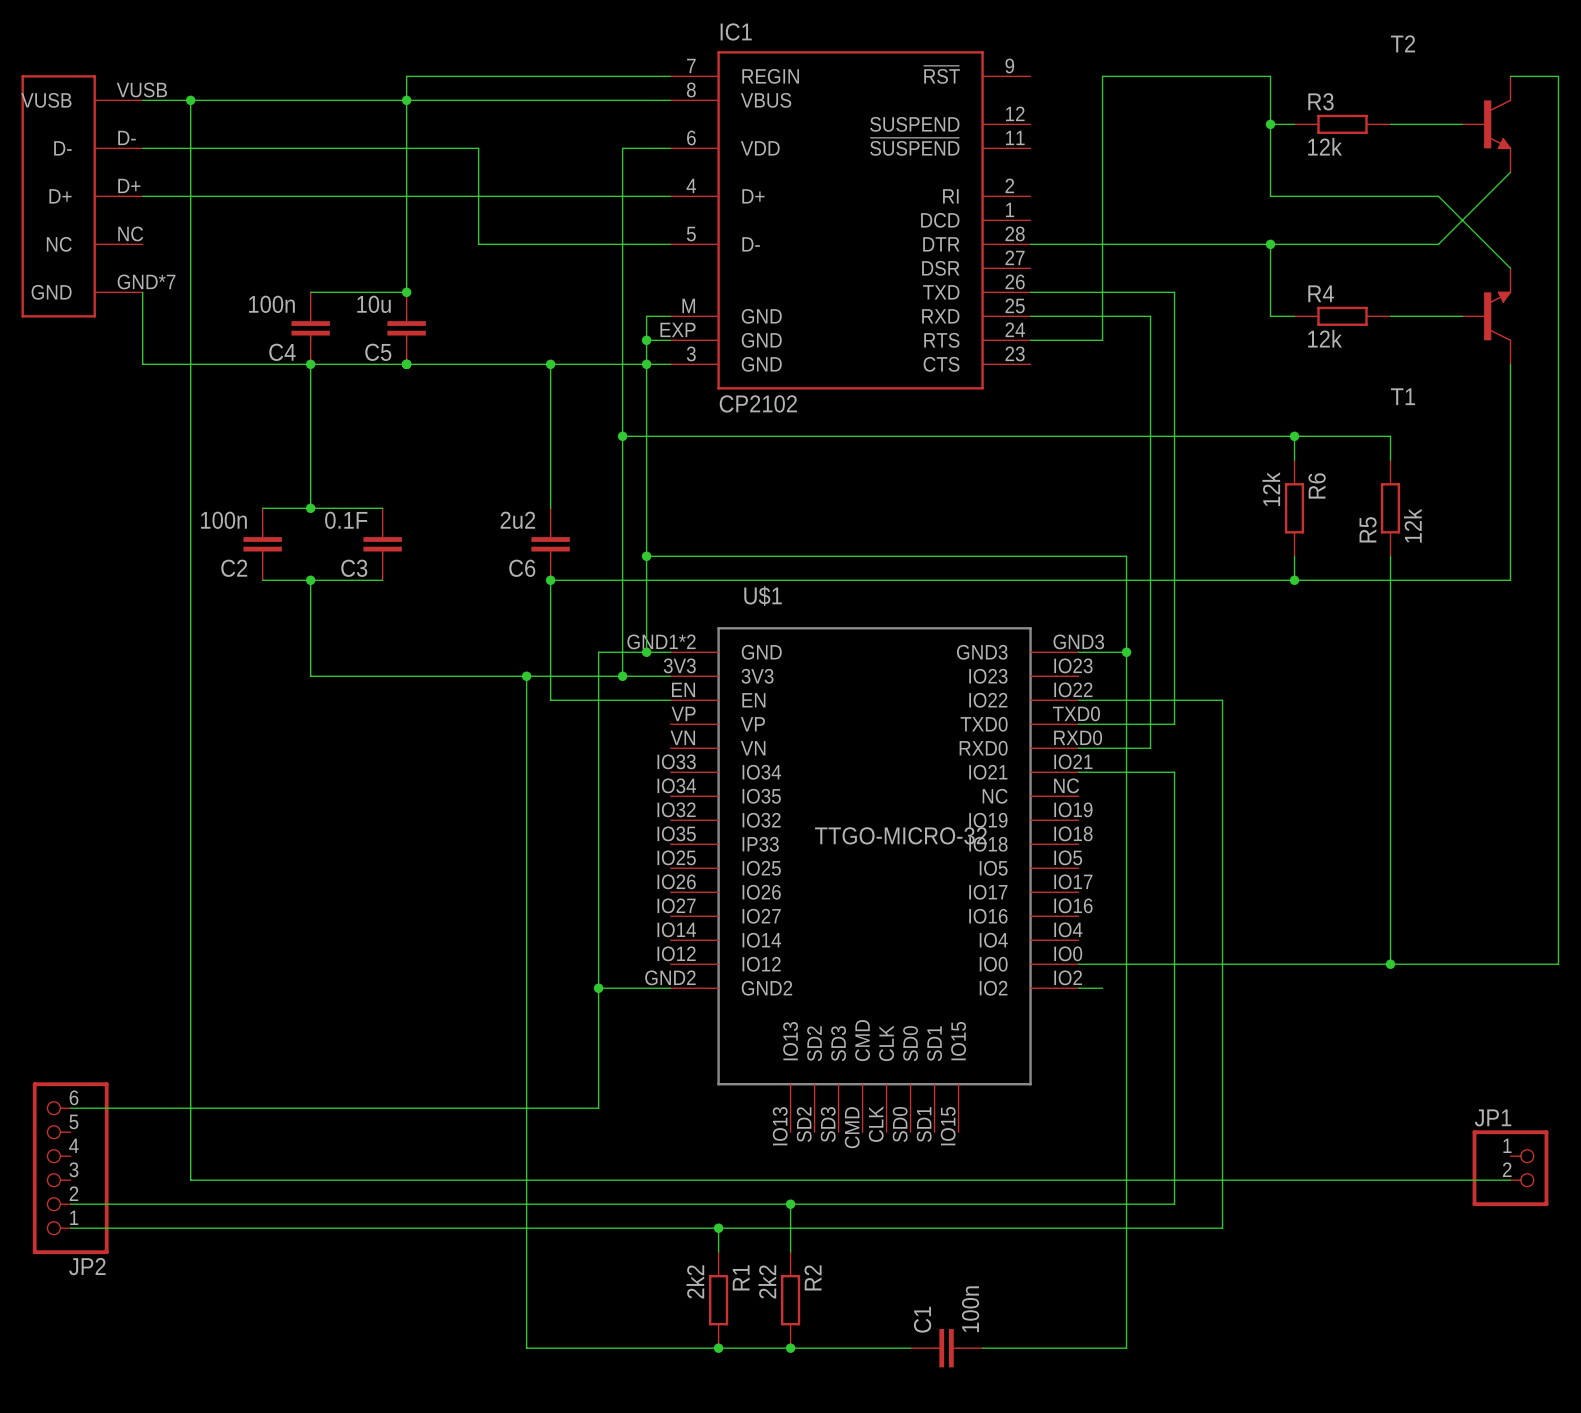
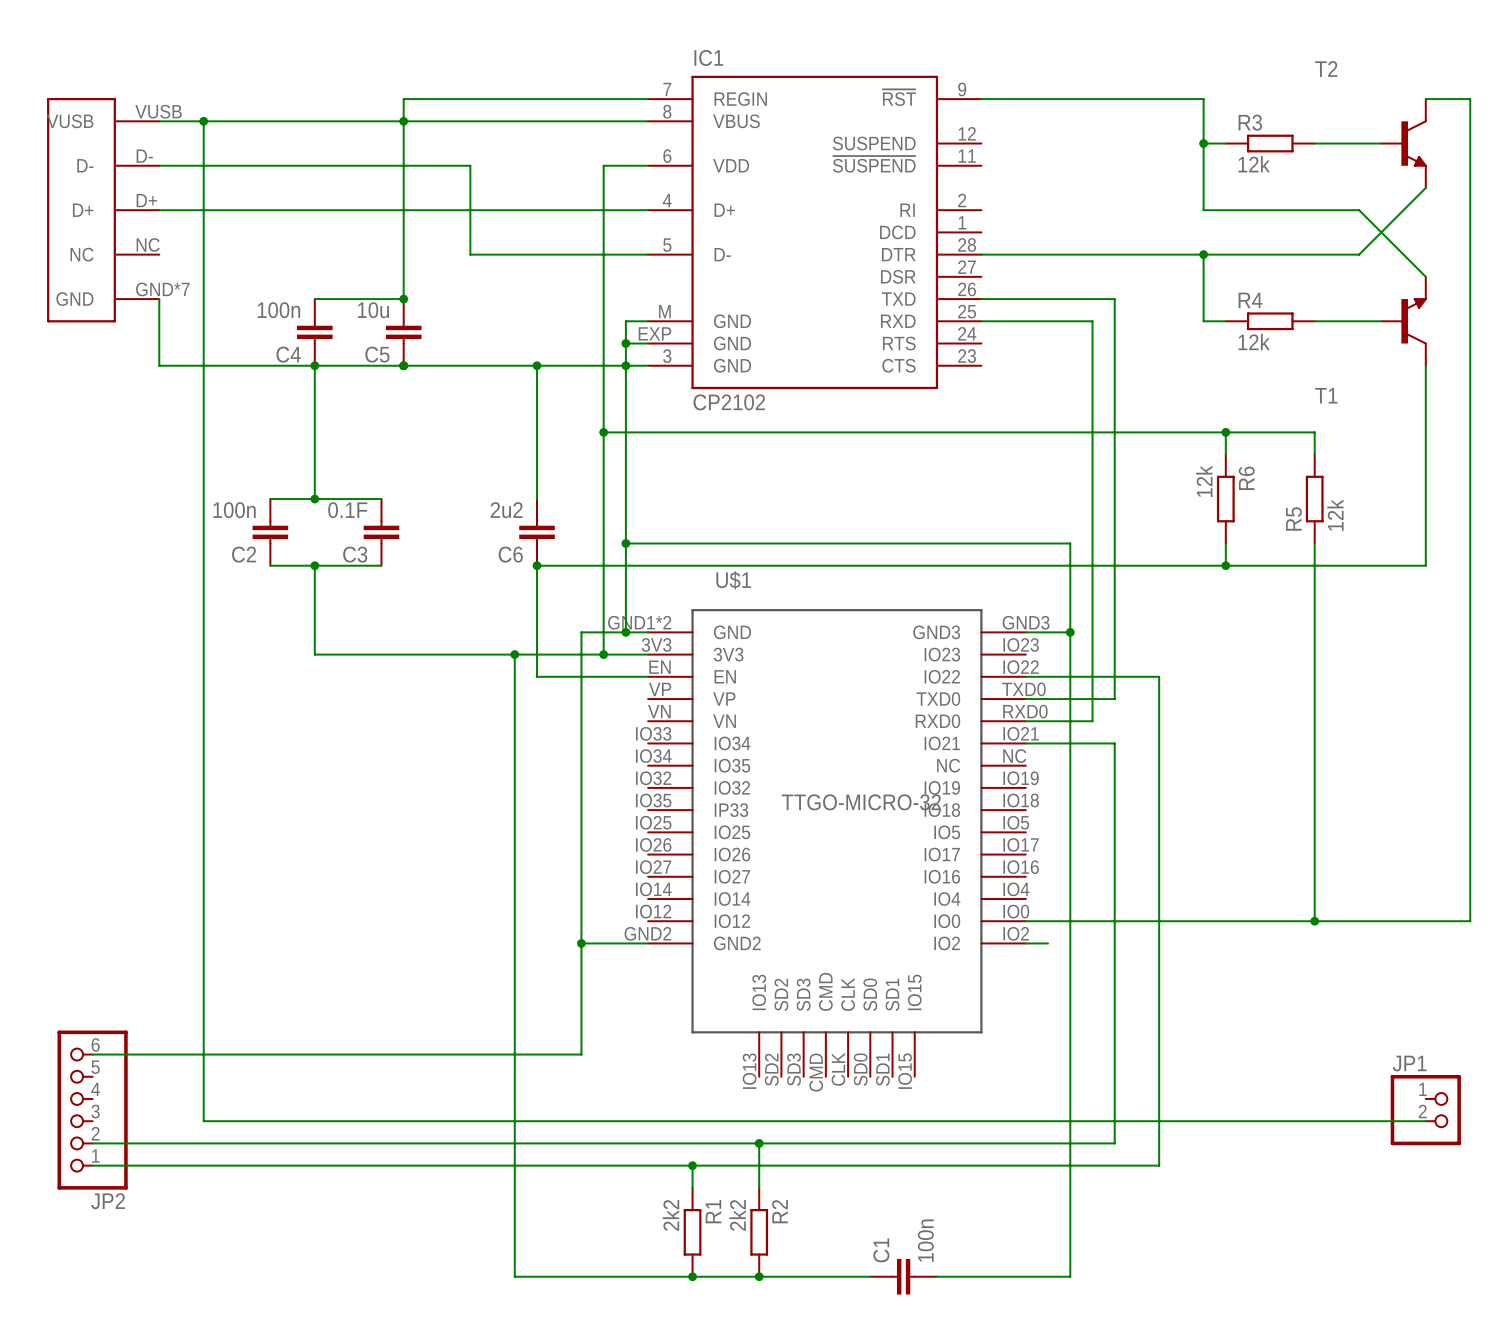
wire: (1102, 76) (1102, 340) (1030, 340) -> (1048, 99) (981, 99)

